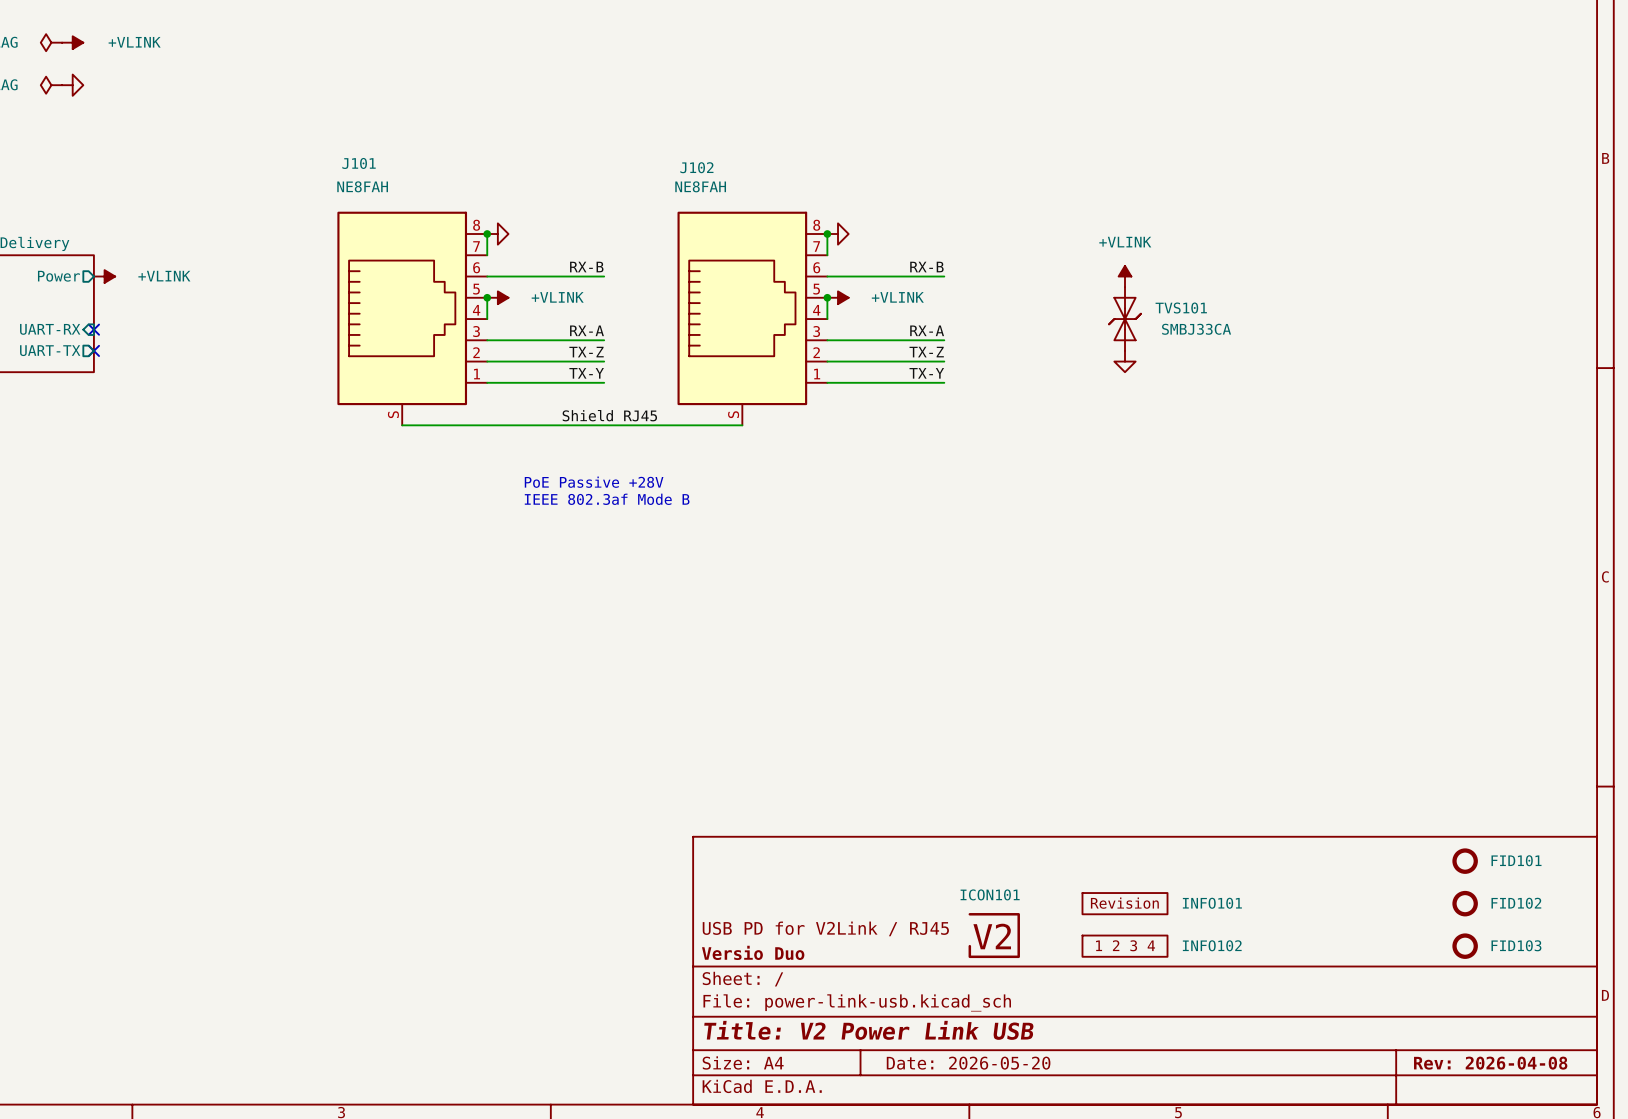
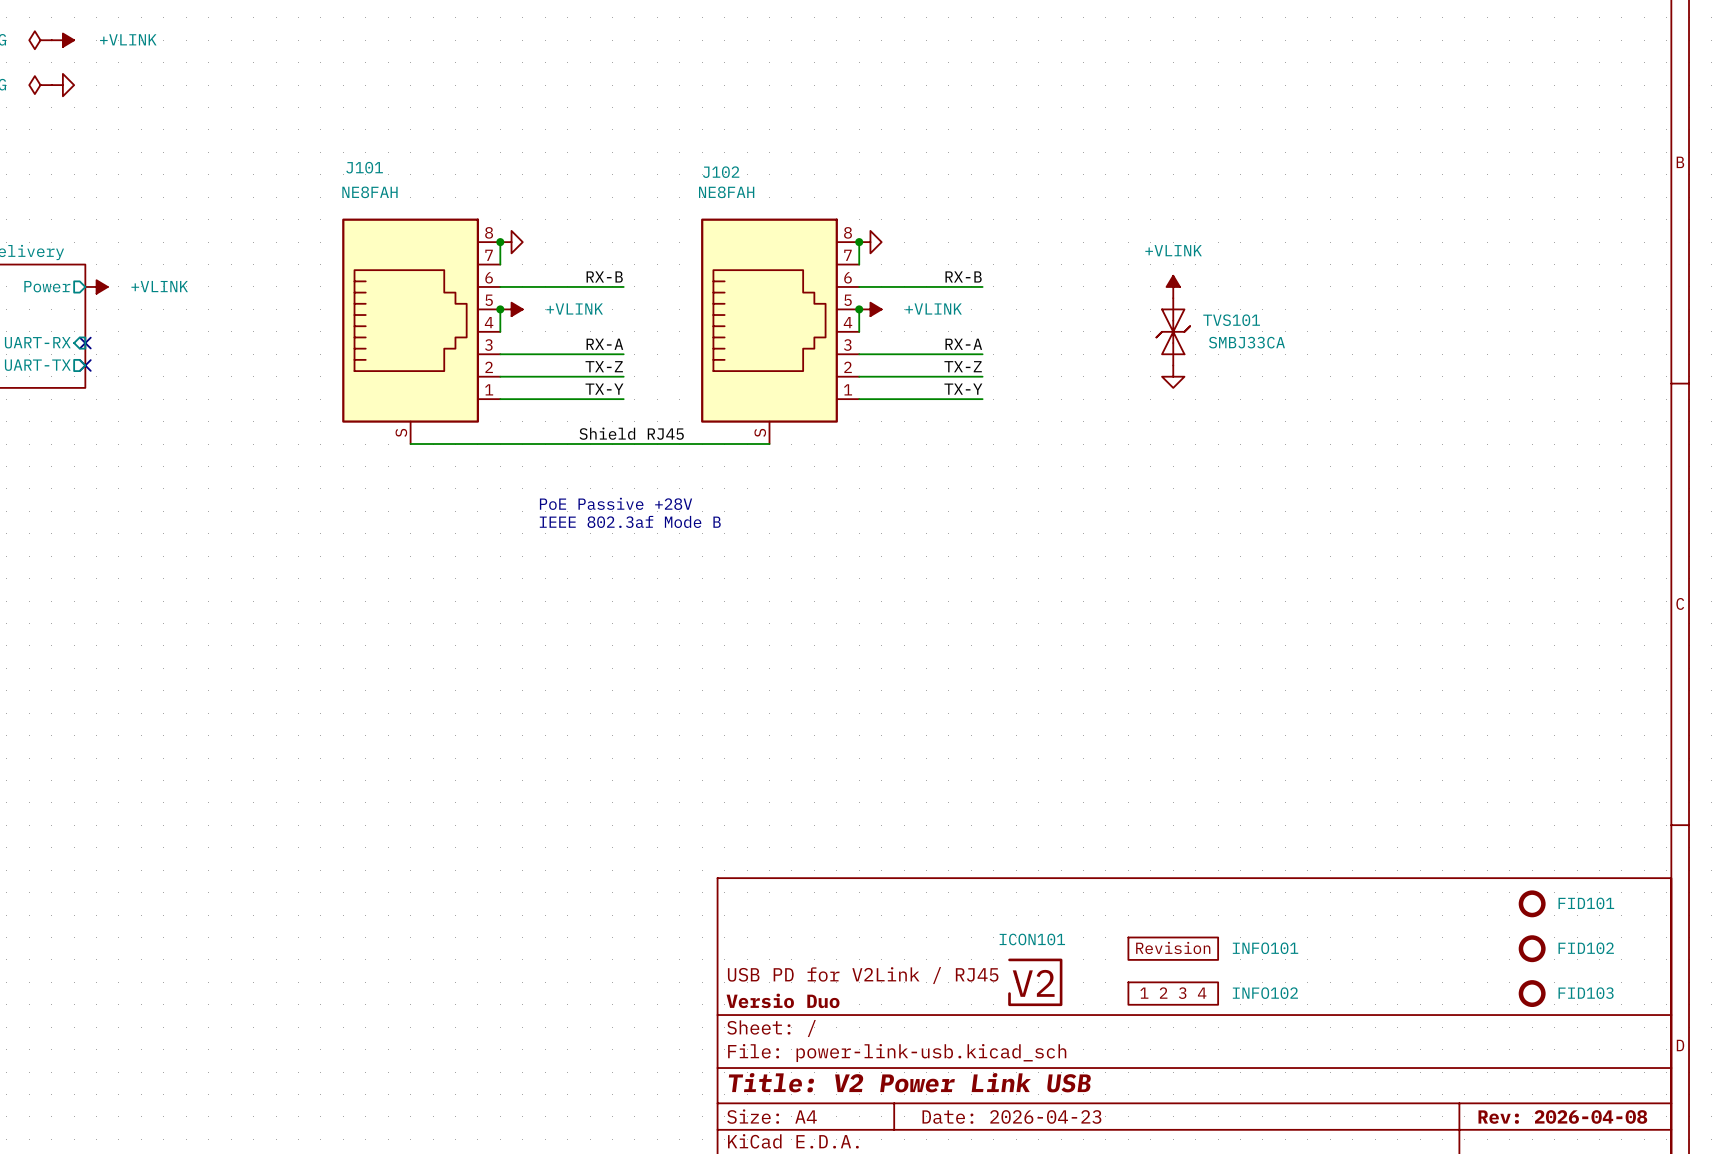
title block: Date: 2026-05-20 (968, 1063) -> Date: 2026-04-23 (1011, 1116)

